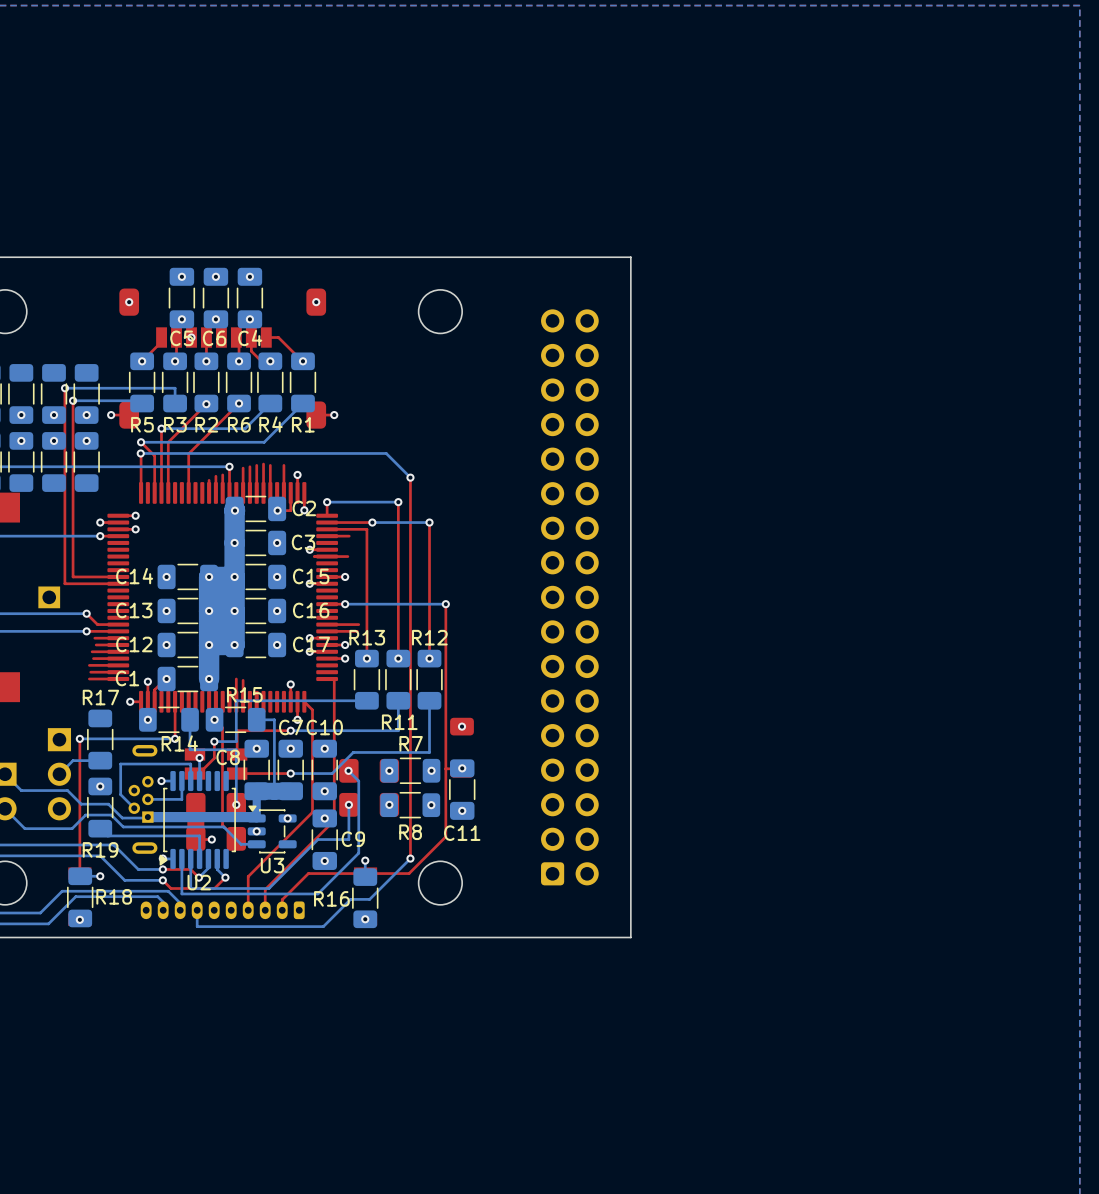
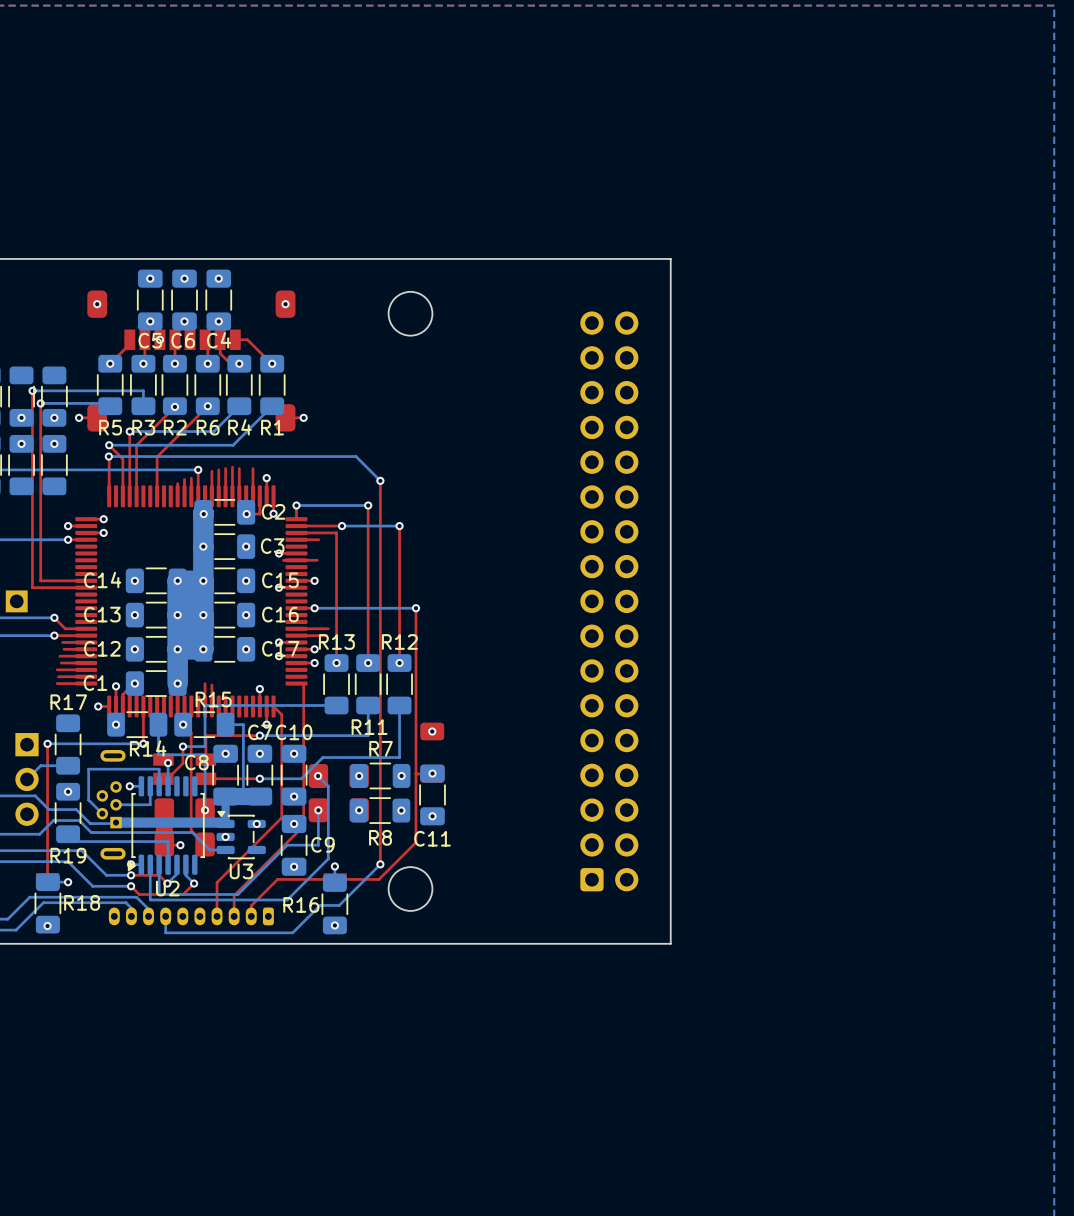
board edge: (630, 257) (630, 937) -> (602, 258) (670, 258) (670, 943) (602, 943)
part position: (569, 597) -> (609, 601)

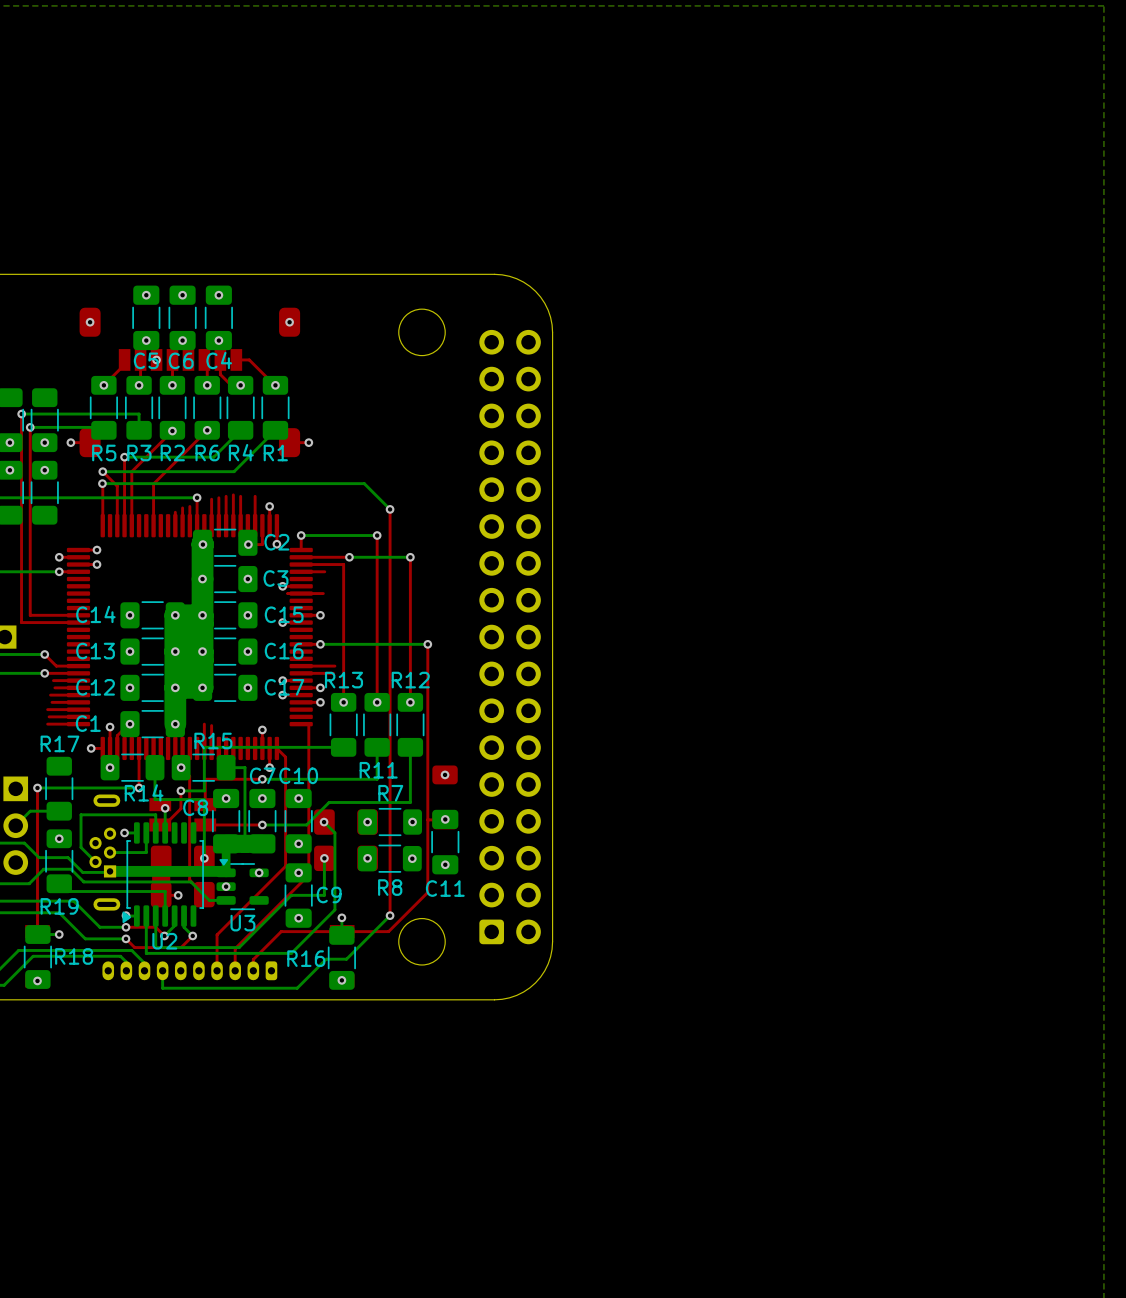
board edge: (478, 258) (670, 258) (670, 943) (478, 943) -> (494, 274) (516, 278) (535, 291) (548, 310) (552, 332) (552, 949) (544, 970) (535, 982) (516, 995) (494, 999)
part position: (609, 601) -> (510, 637)
U3 footprint: [216, 810, 266, 860] -> [216, 859, 269, 911]

